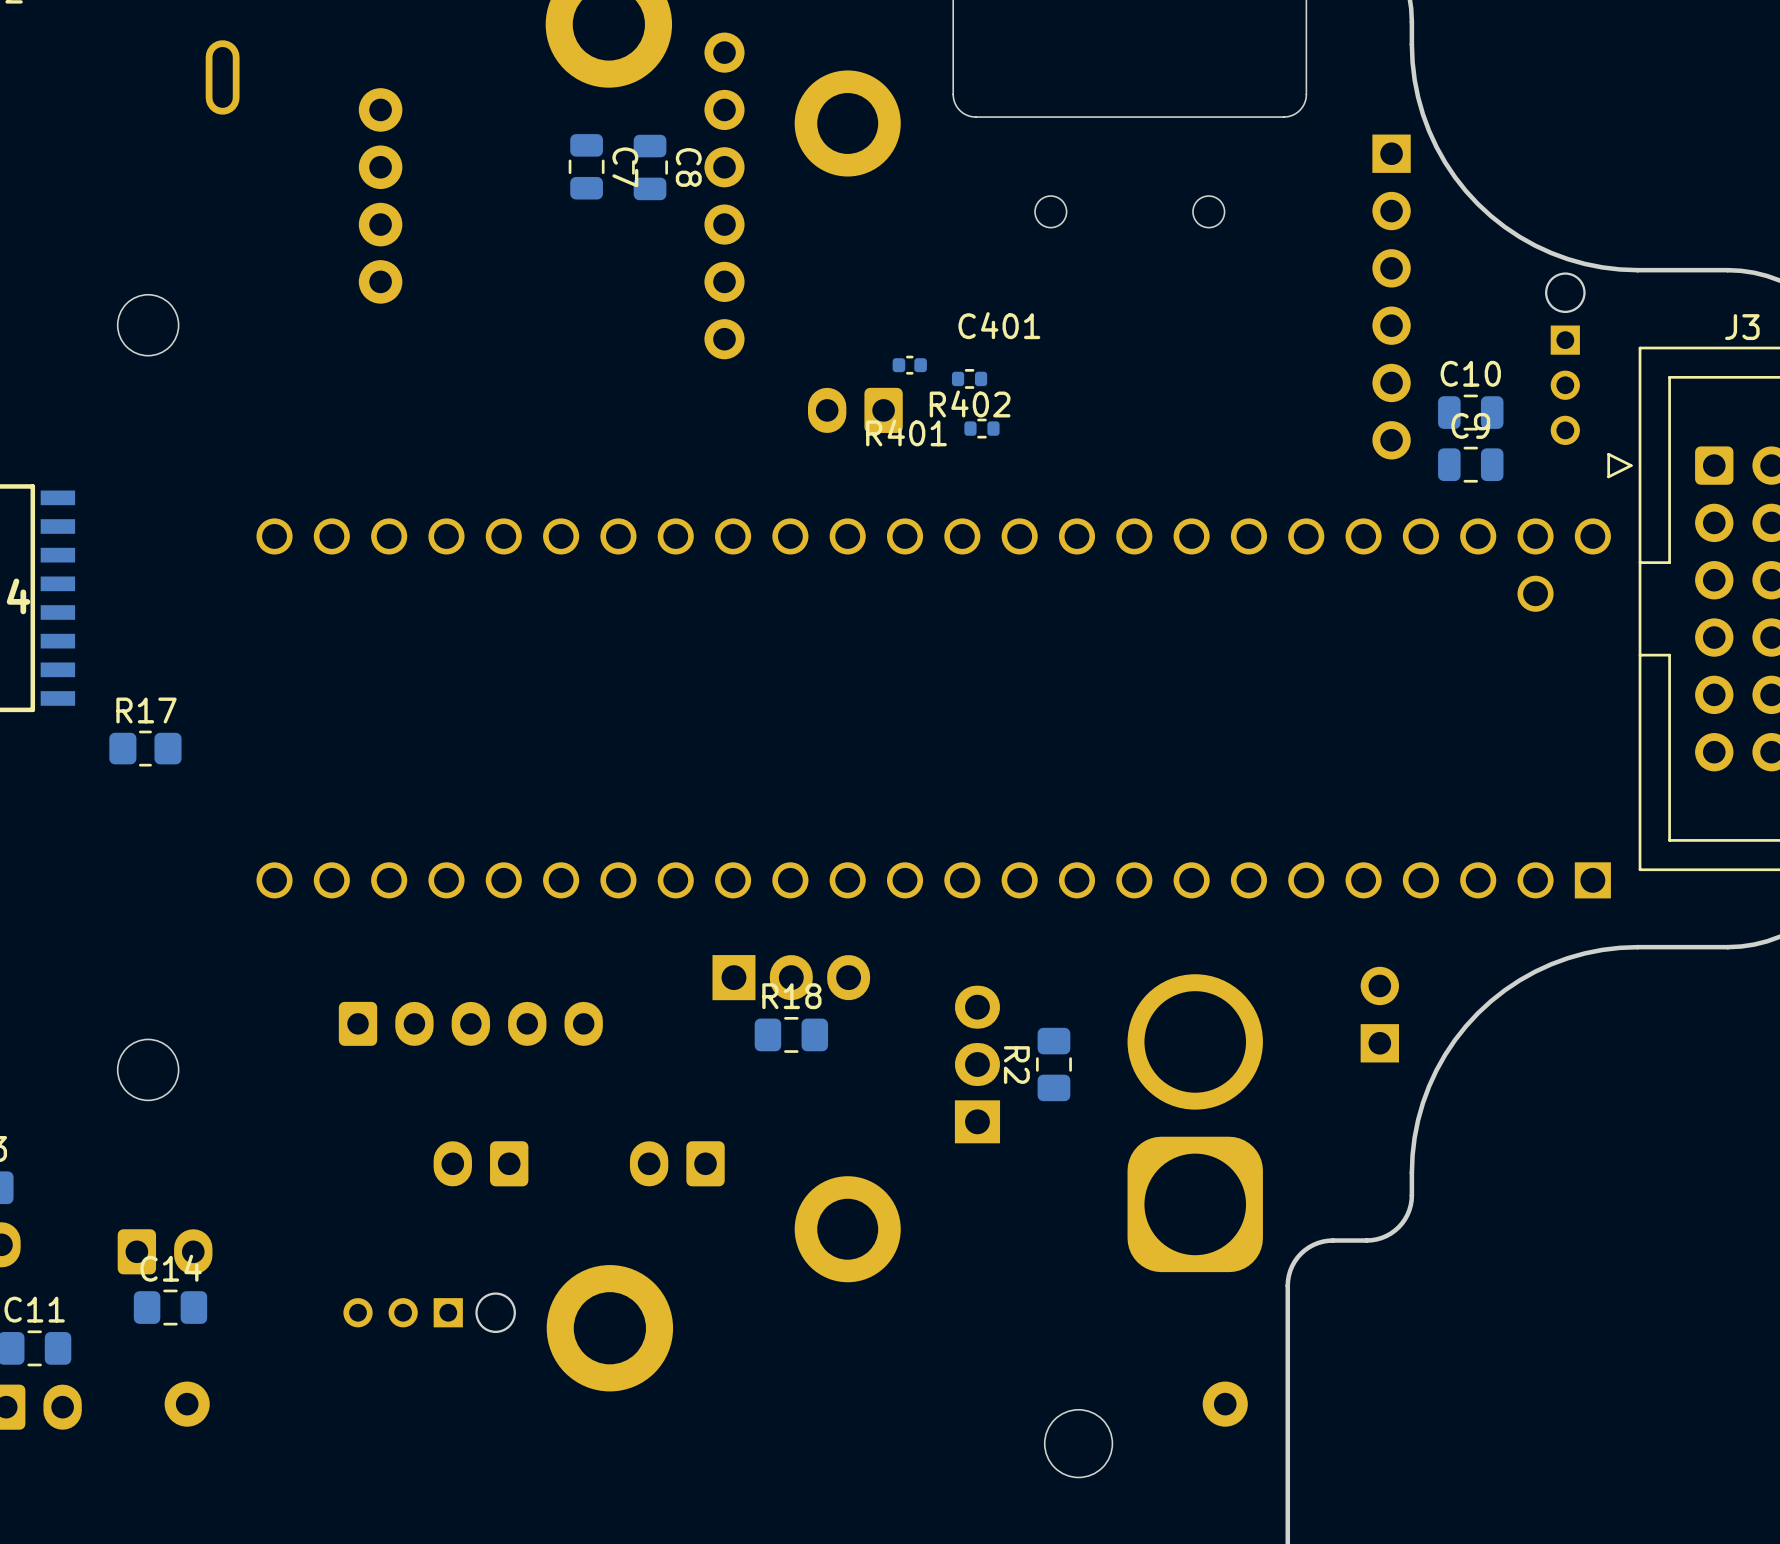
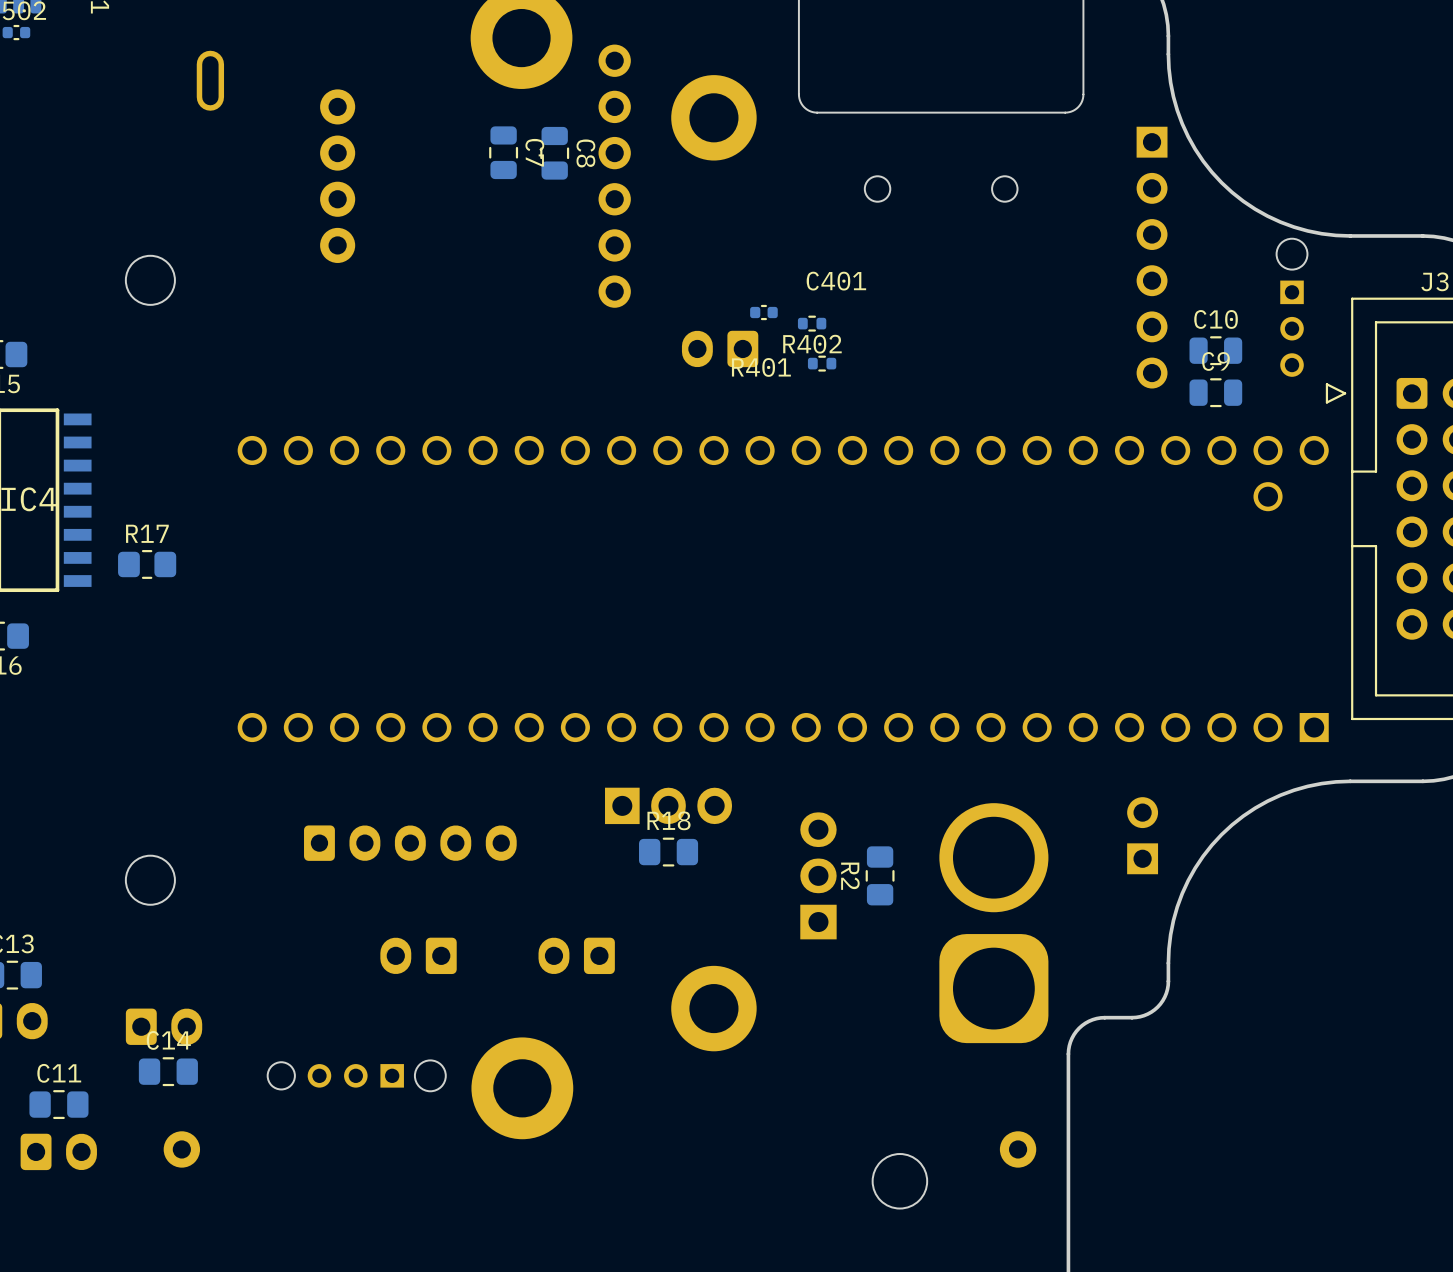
R17 position: (145, 748) -> (147, 564)
part: none -> (356, 1075)

